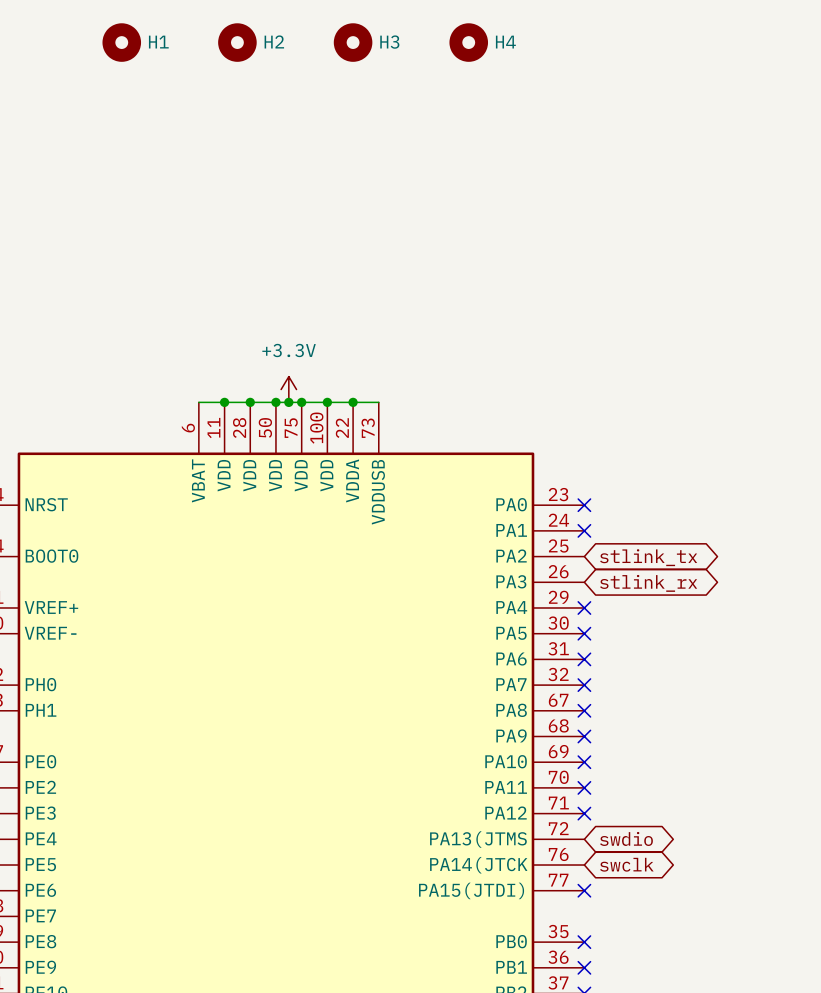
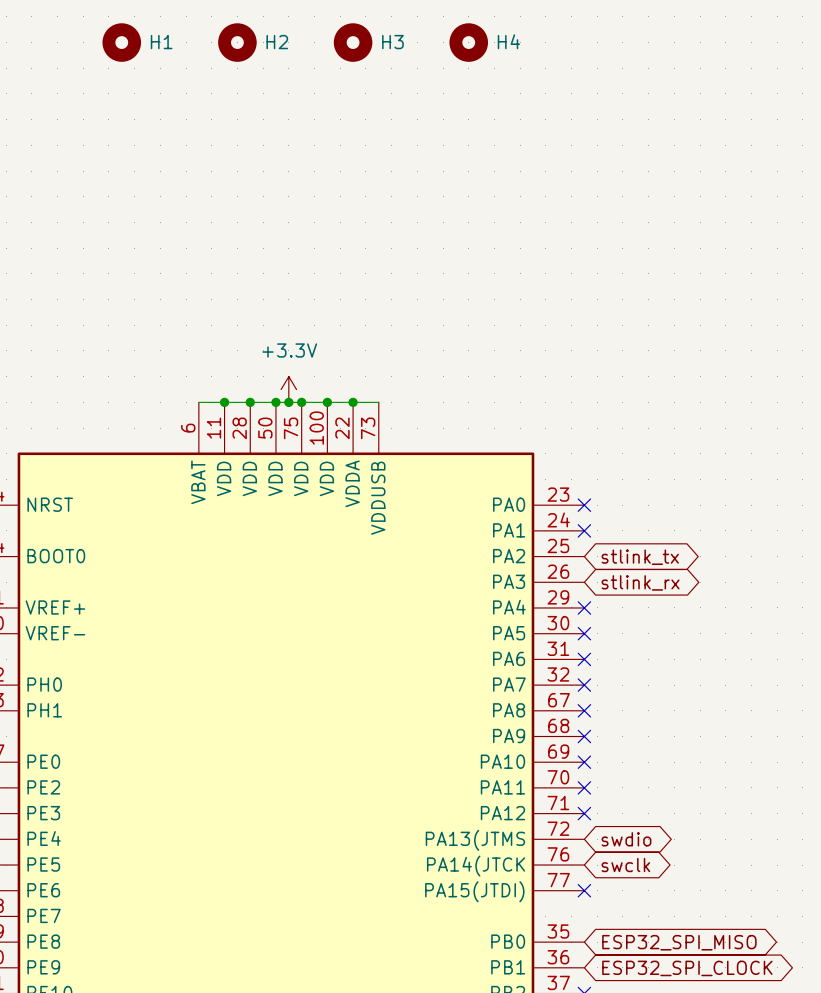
no-connect mark: (584, 942) -> none
global label: none -> ESP32_SPI_MISO (679, 942)
no-connect mark: (584, 967) -> none
global label: none -> ESP32_SPI_CLOCK (687, 968)

